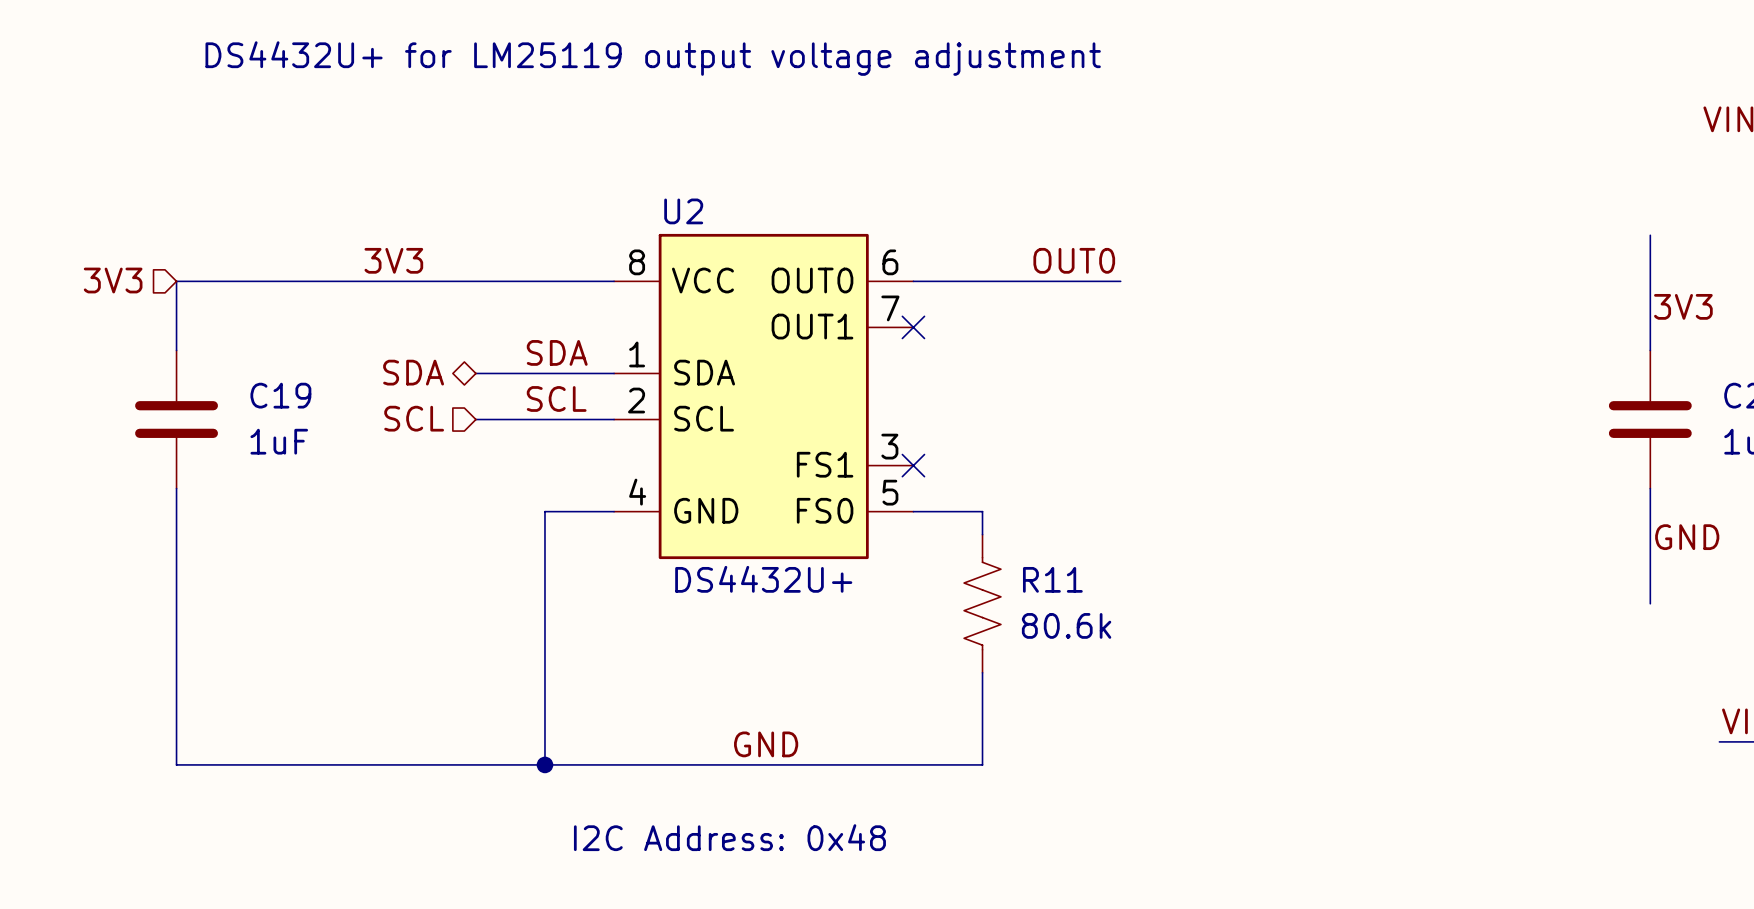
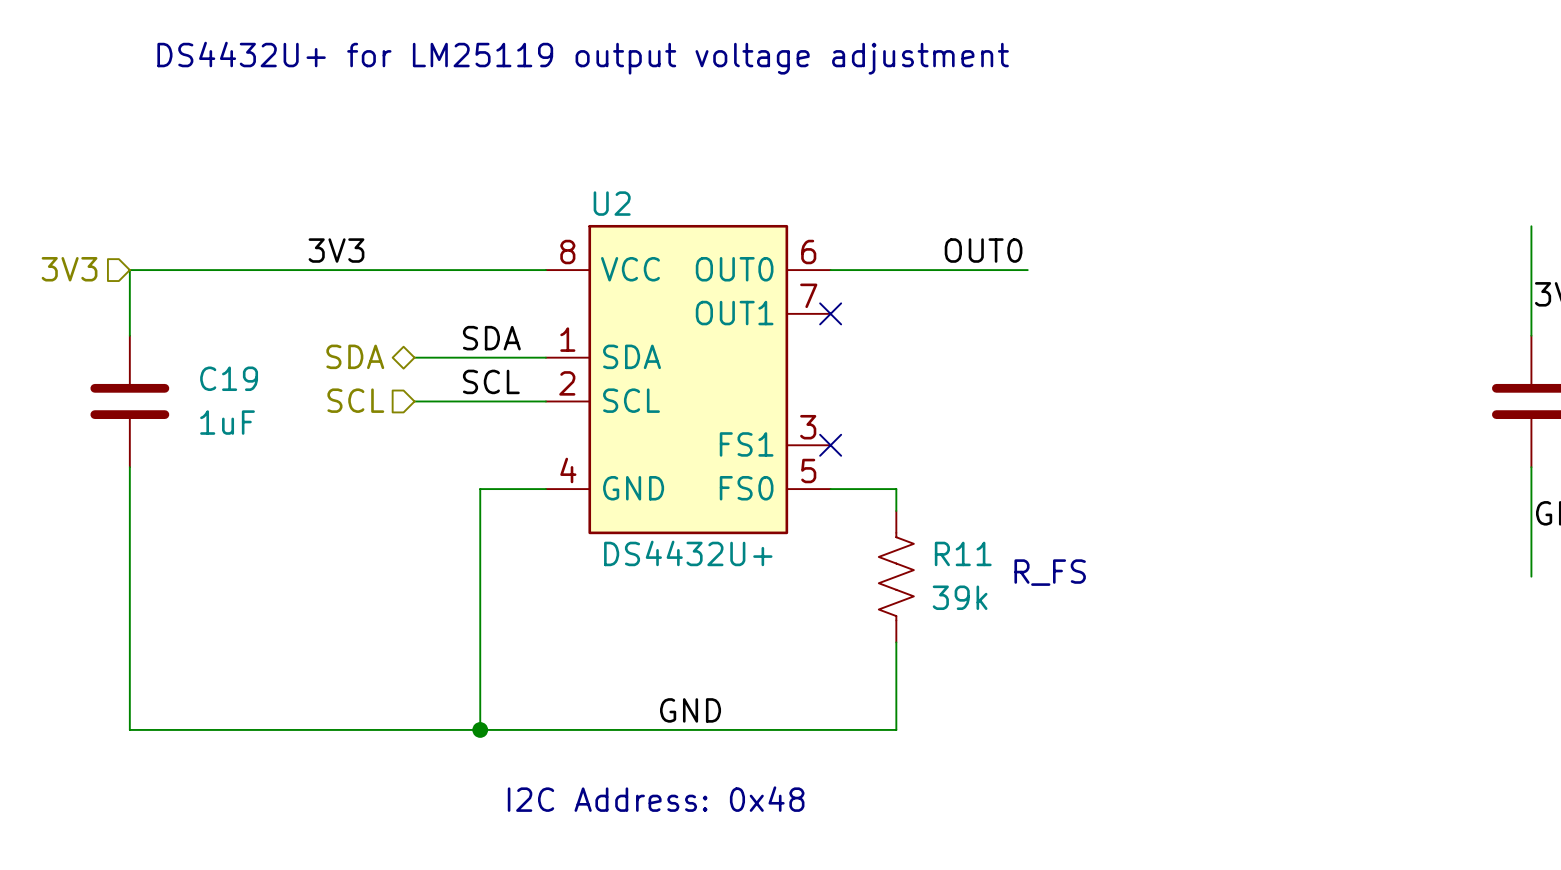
text: none -> R_FS (1050, 572)
R11 value: 80.6k (1066, 625) -> 39k (960, 597)

